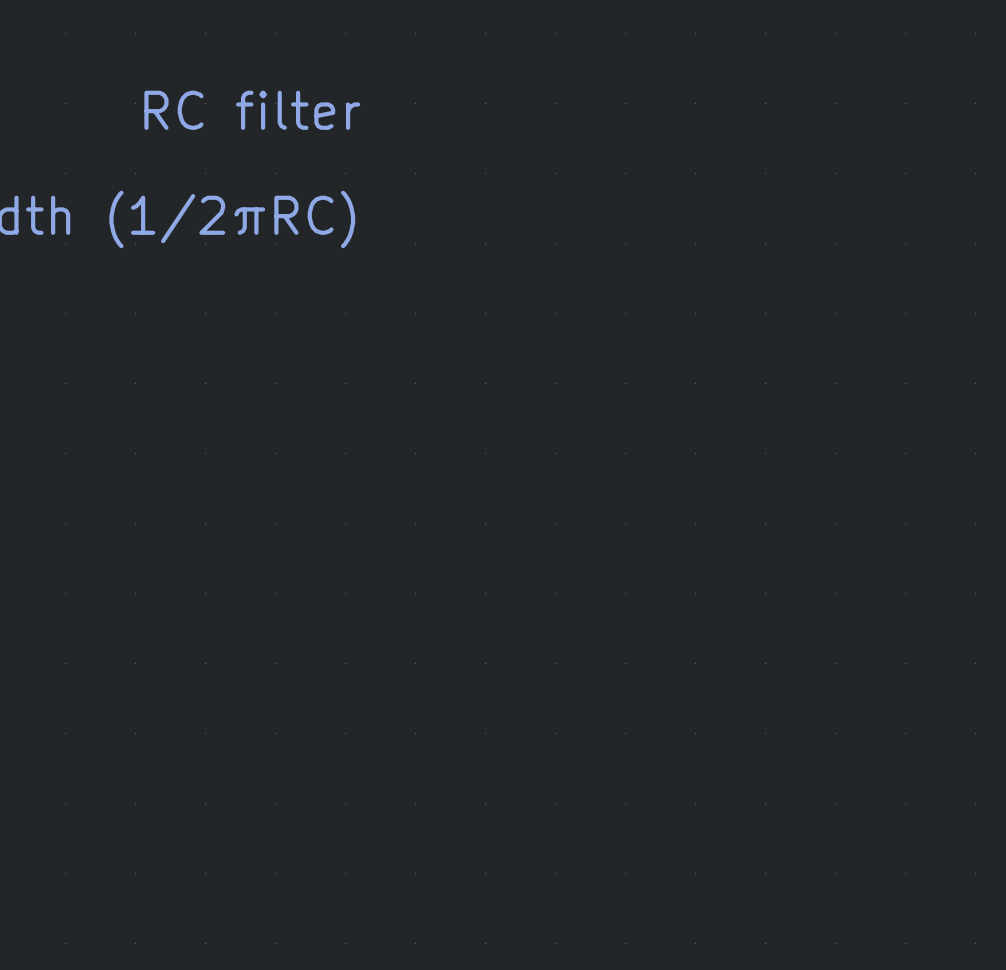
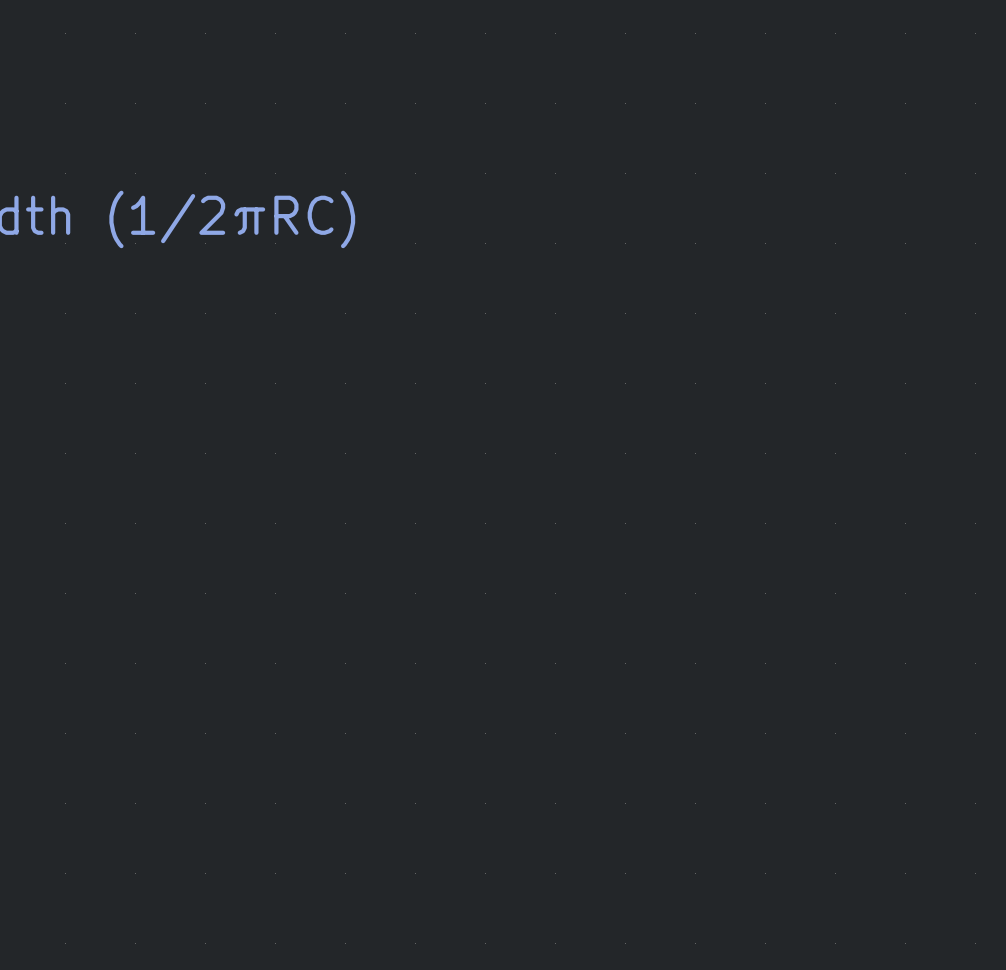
text: RC filter (252, 110) -> none

